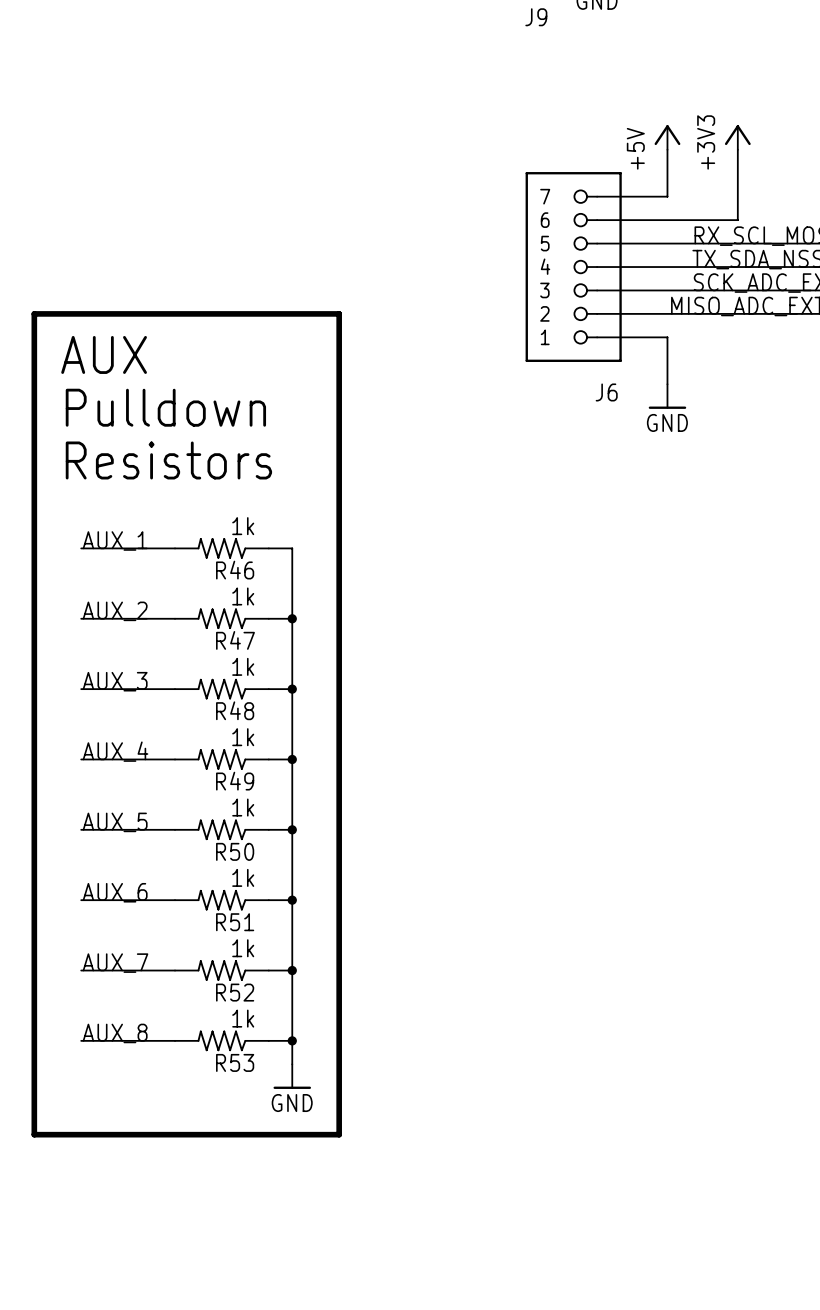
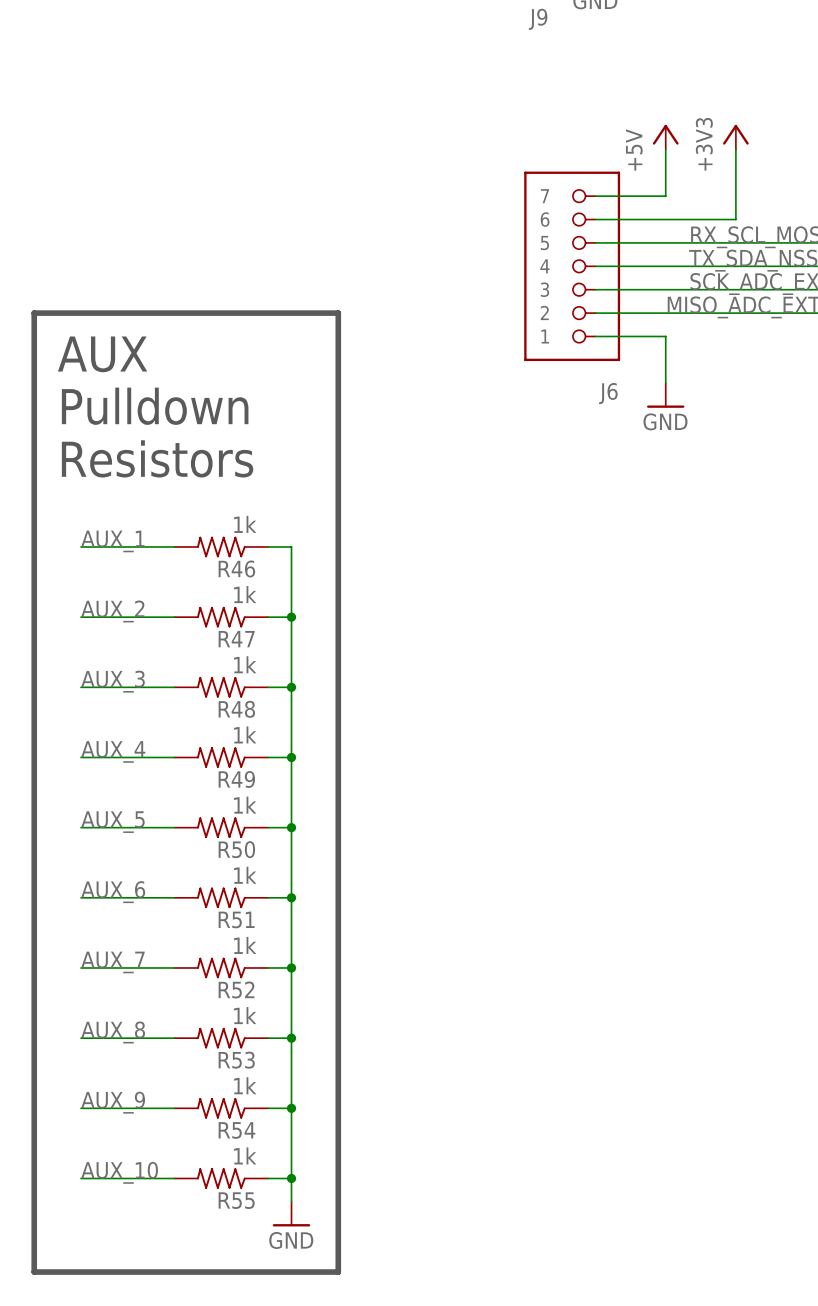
wire: none -> (291, 1061) (291, 1201)
power symbol position: GND (292, 1076) -> GND (291, 1214)
label: none -> AUX_9 (113, 1102)
wire: none -> (81, 1108) (174, 1108)
R54: none -> 1k (221, 1108)
wire: none -> (268, 1108) (291, 1108)
junction: none -> (291, 1108)
line: (34, 1134) (339, 1134) -> (34, 1131) (34, 1272) (338, 1272) (338, 1131)
label: none -> AUX_10 (119, 1172)
wire: none -> (81, 1178) (174, 1178)
R55: none -> 1k (221, 1178)
wire: none -> (268, 1178) (291, 1178)
junction: none -> (291, 1178)

